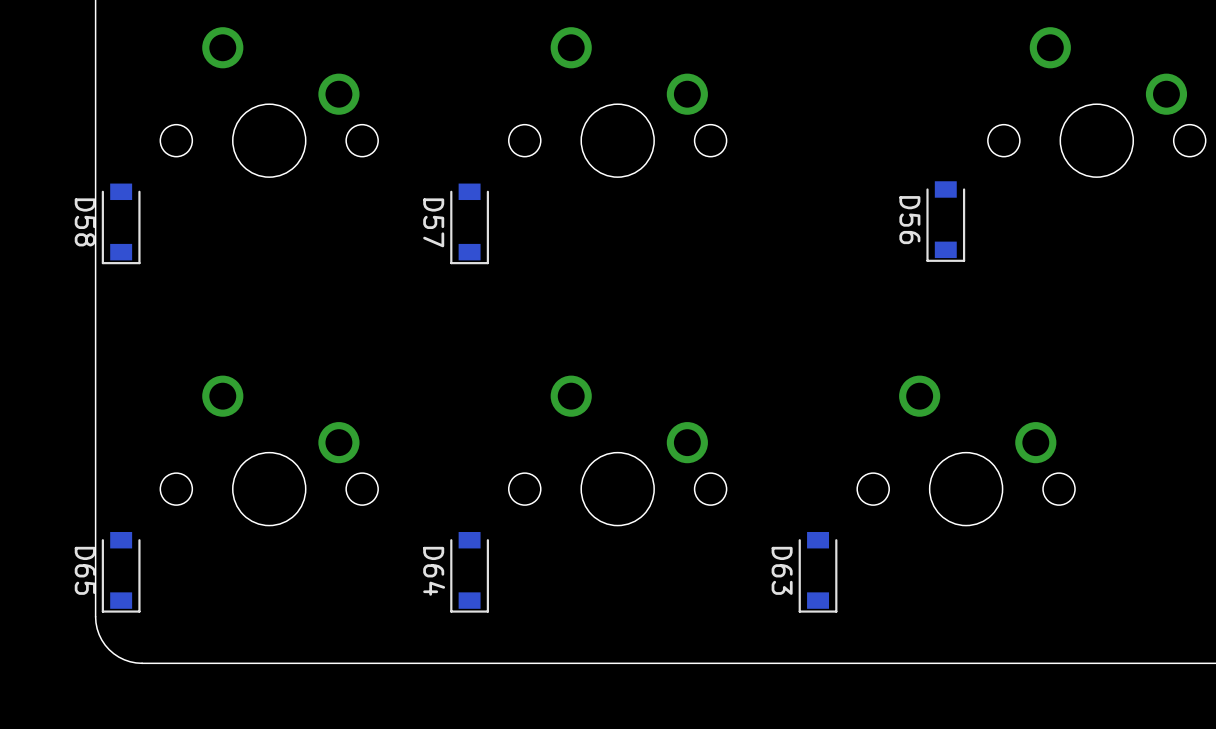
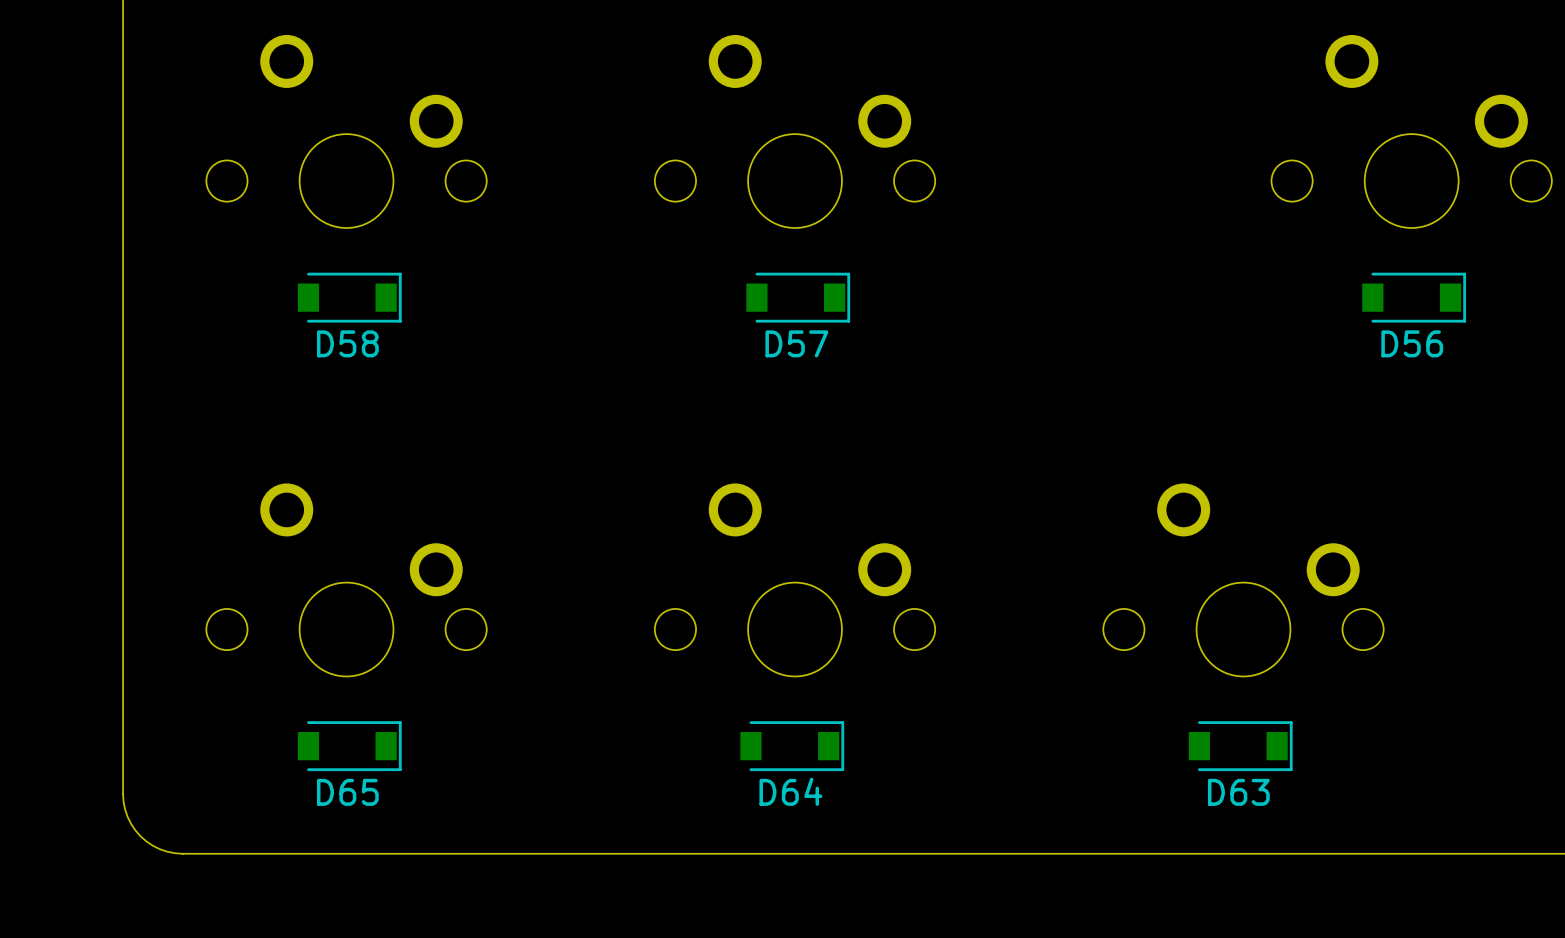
D56 rotation: 0° (945, 221) -> 90° counterclockwise (1414, 297)
D56 position: (945, 221) -> (1414, 297)
D58 rotation: 0° (121, 223) -> 90° counterclockwise (349, 297)
D58 position: (121, 223) -> (349, 297)
D57 rotation: 0° (469, 223) -> 90° counterclockwise (798, 297)
D57 position: (469, 223) -> (798, 297)
D65 rotation: 0° (121, 572) -> 90° counterclockwise (349, 746)
D65 position: (121, 572) -> (349, 746)
D64 rotation: 0° (469, 572) -> 90° counterclockwise (792, 746)
D64 position: (469, 572) -> (792, 746)
D63 rotation: 0° (818, 572) -> 90° counterclockwise (1240, 746)
D63 position: (818, 572) -> (1240, 746)

